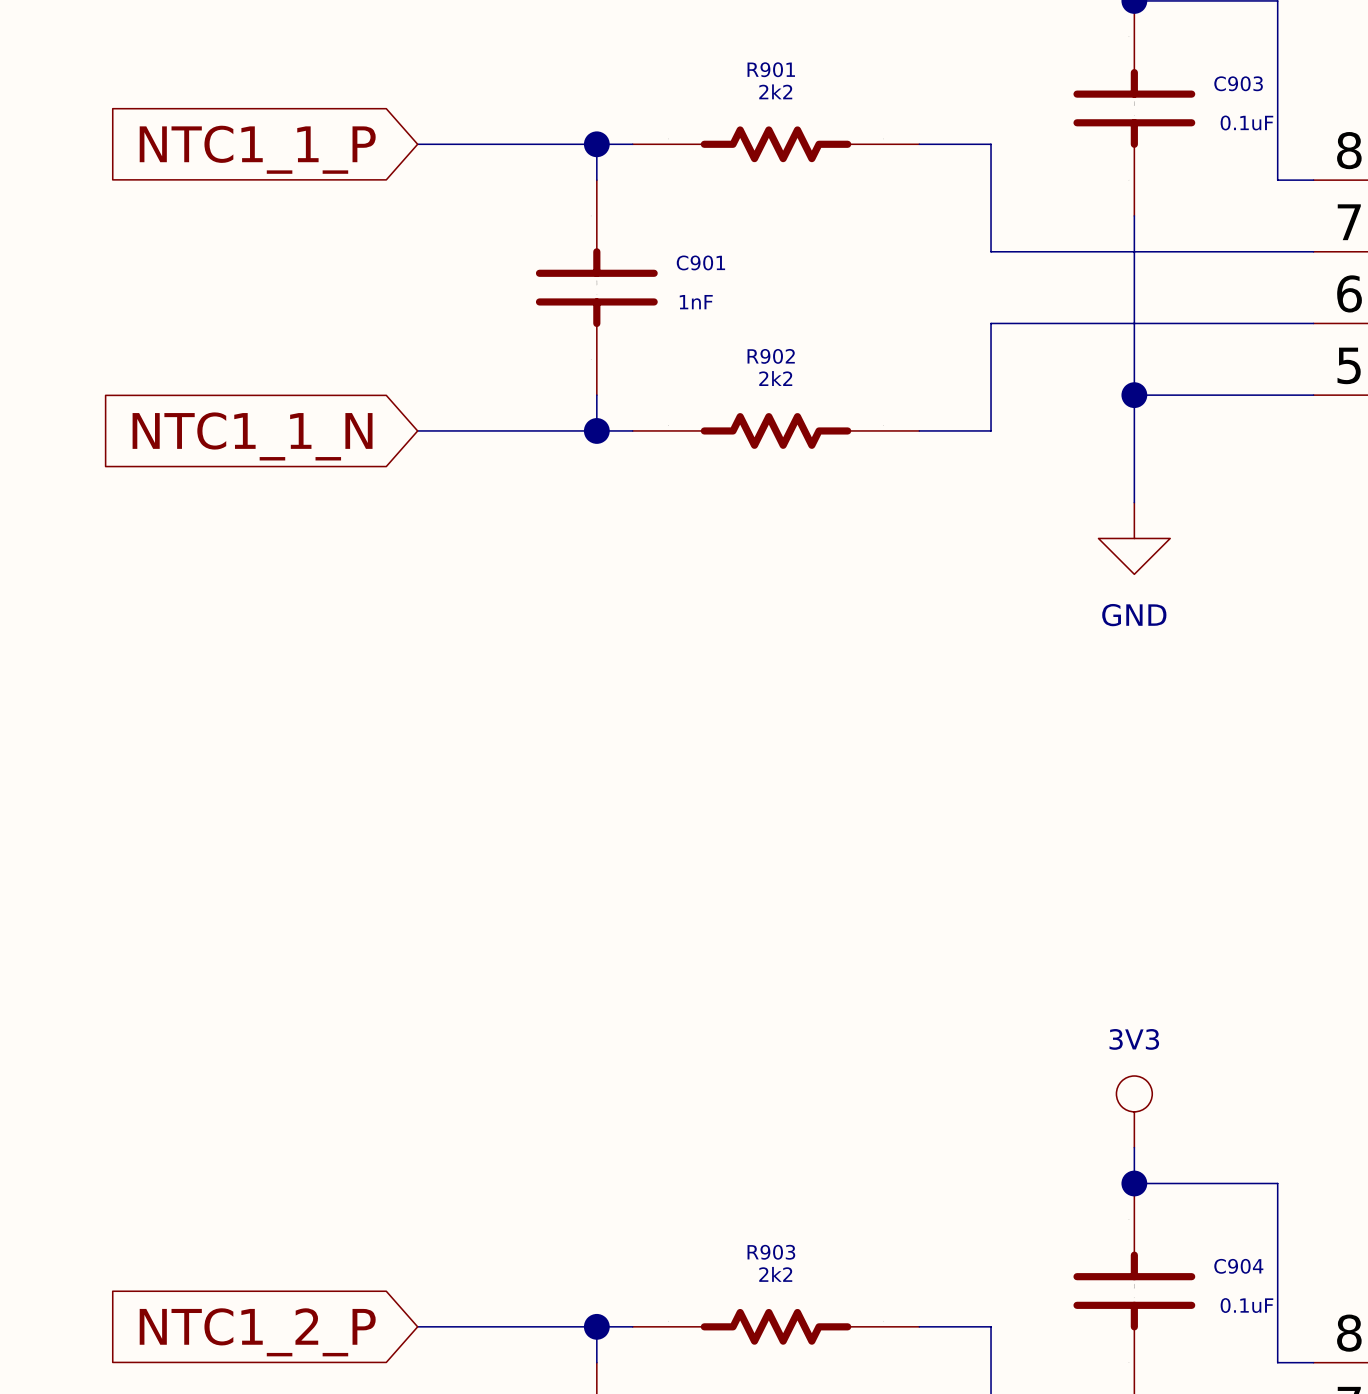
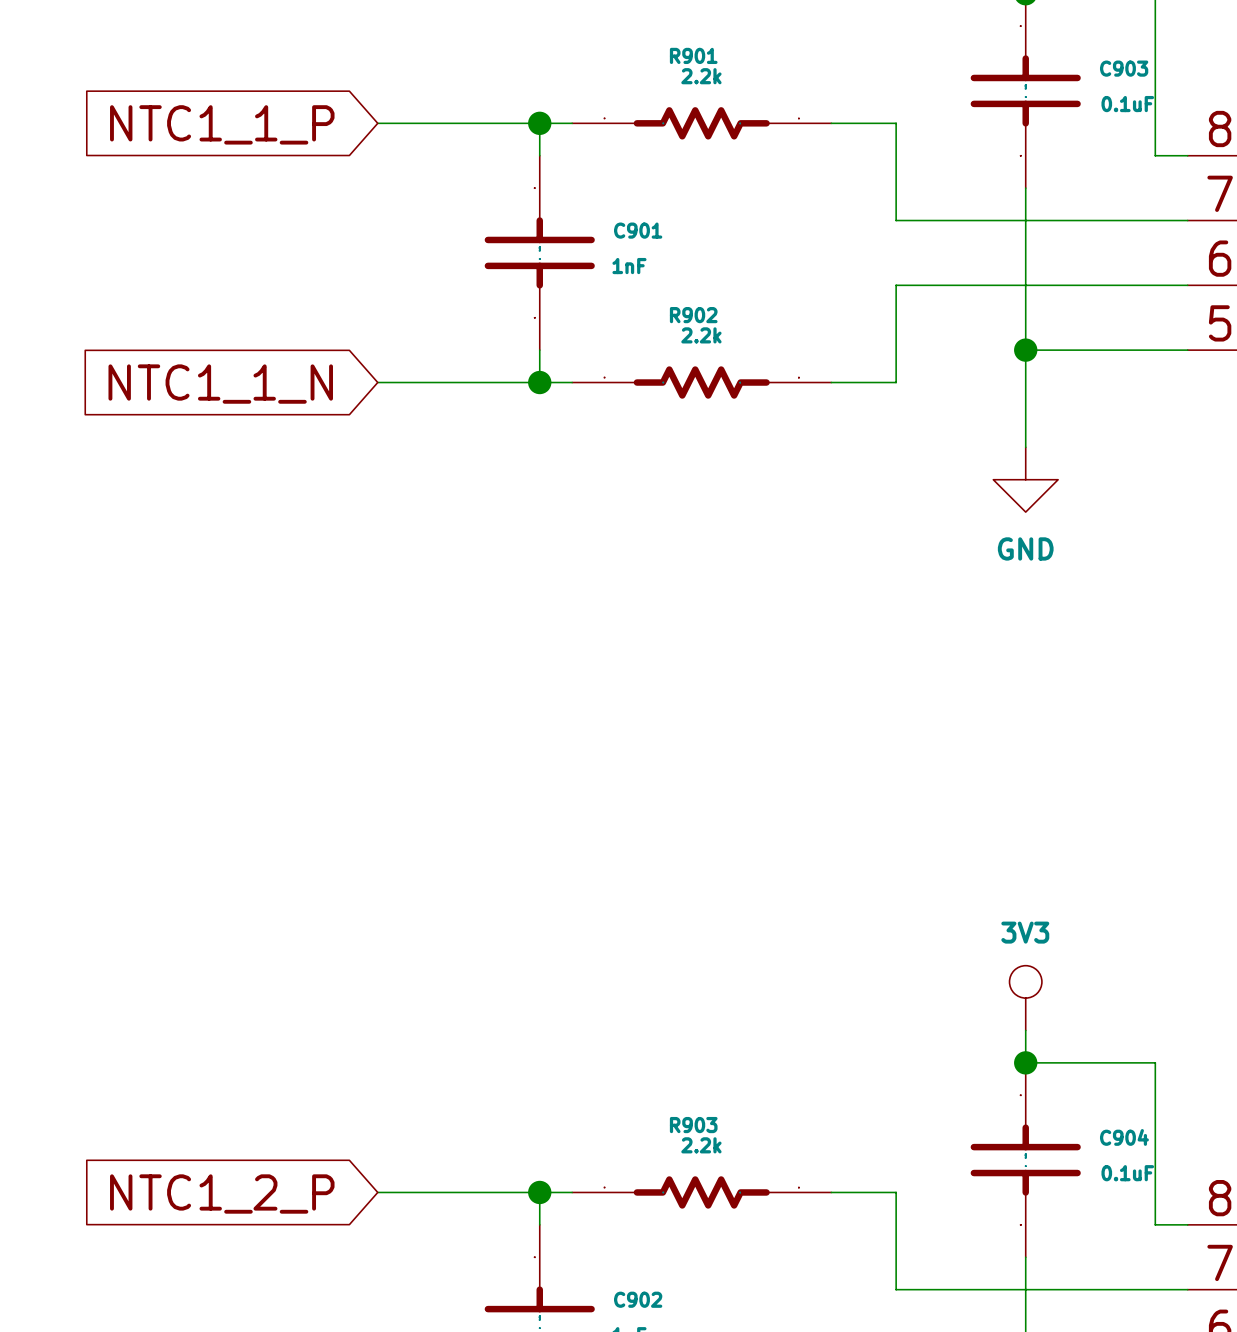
R901 value: 2k2 (775, 91) -> 2.2k (701, 76)
R902 value: 2k2 (775, 378) -> 2.2k (701, 335)
R903 value: 2k2 (775, 1274) -> 2.2k (701, 1145)

